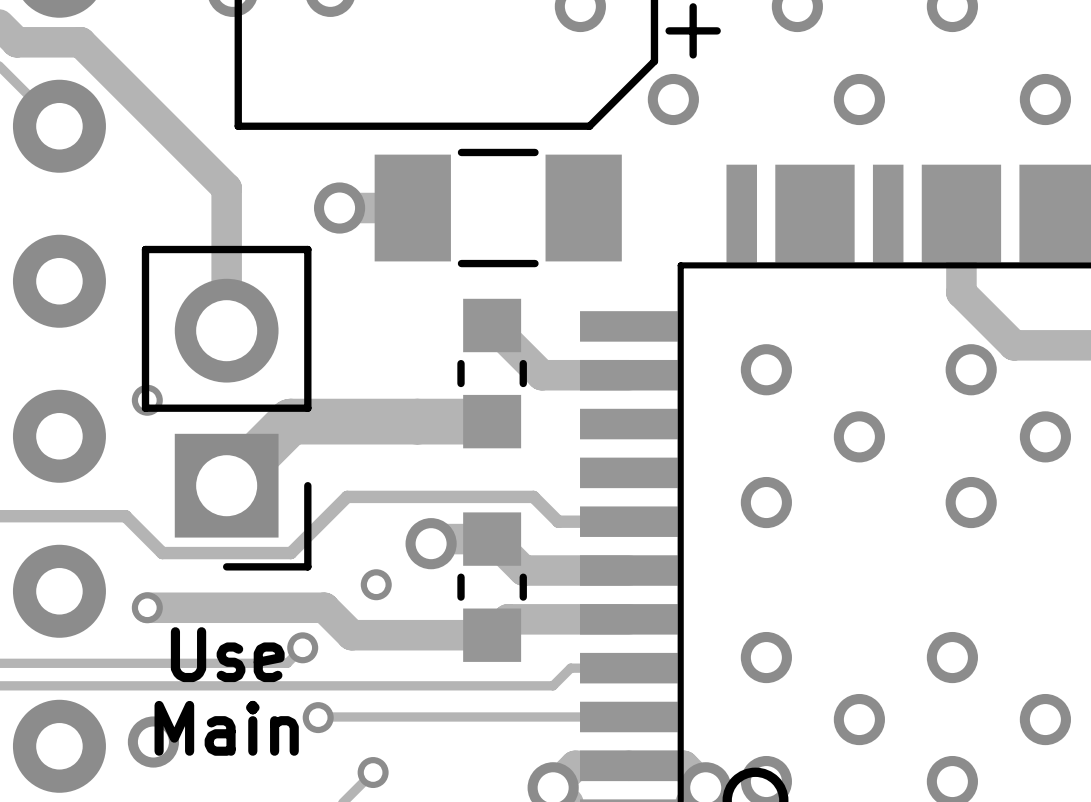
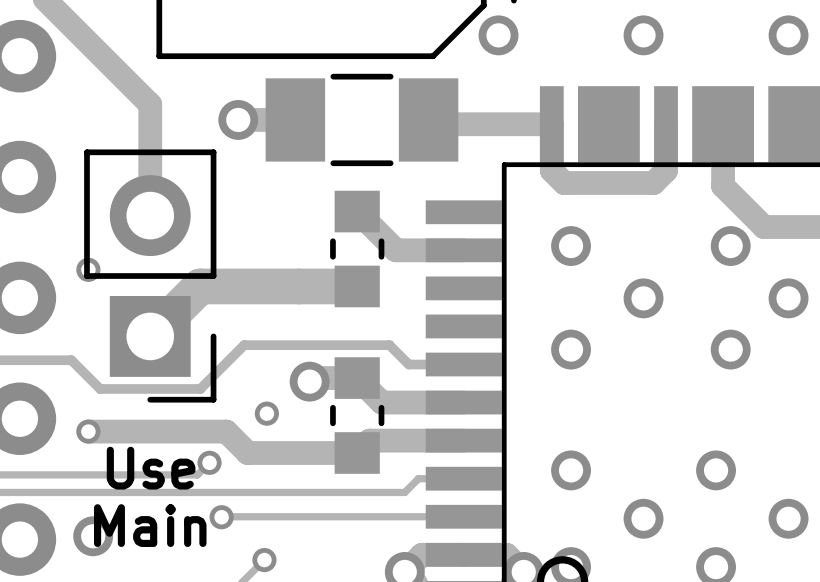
track: none -> (432, 124) (551, 124) (551, 170) (564, 183) (653, 183) (666, 170) (666, 124)

